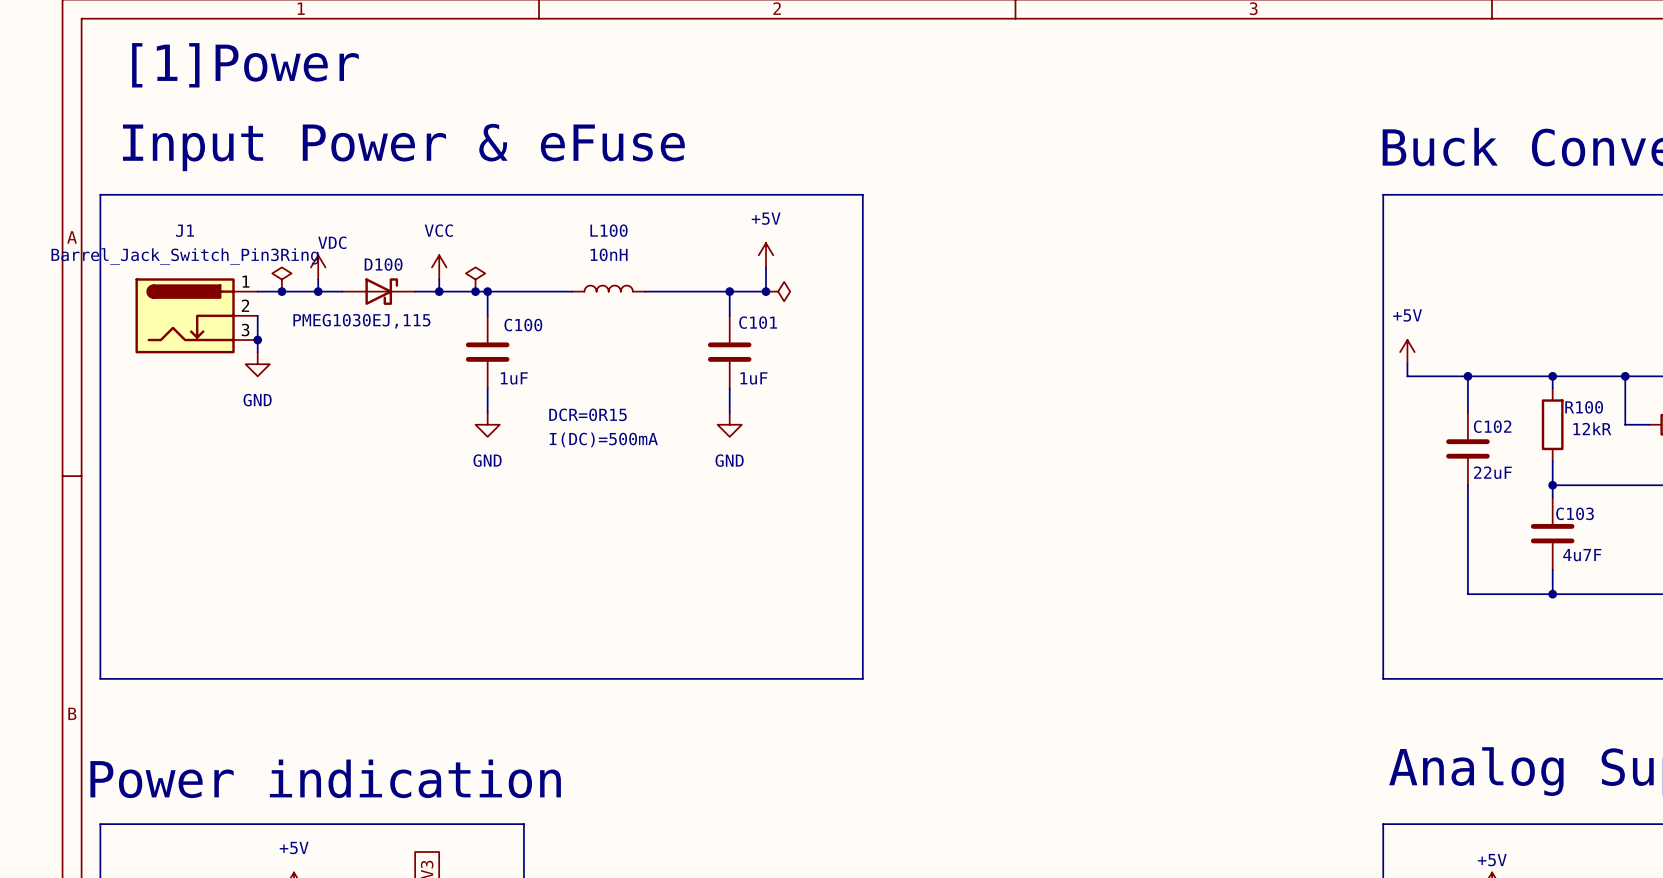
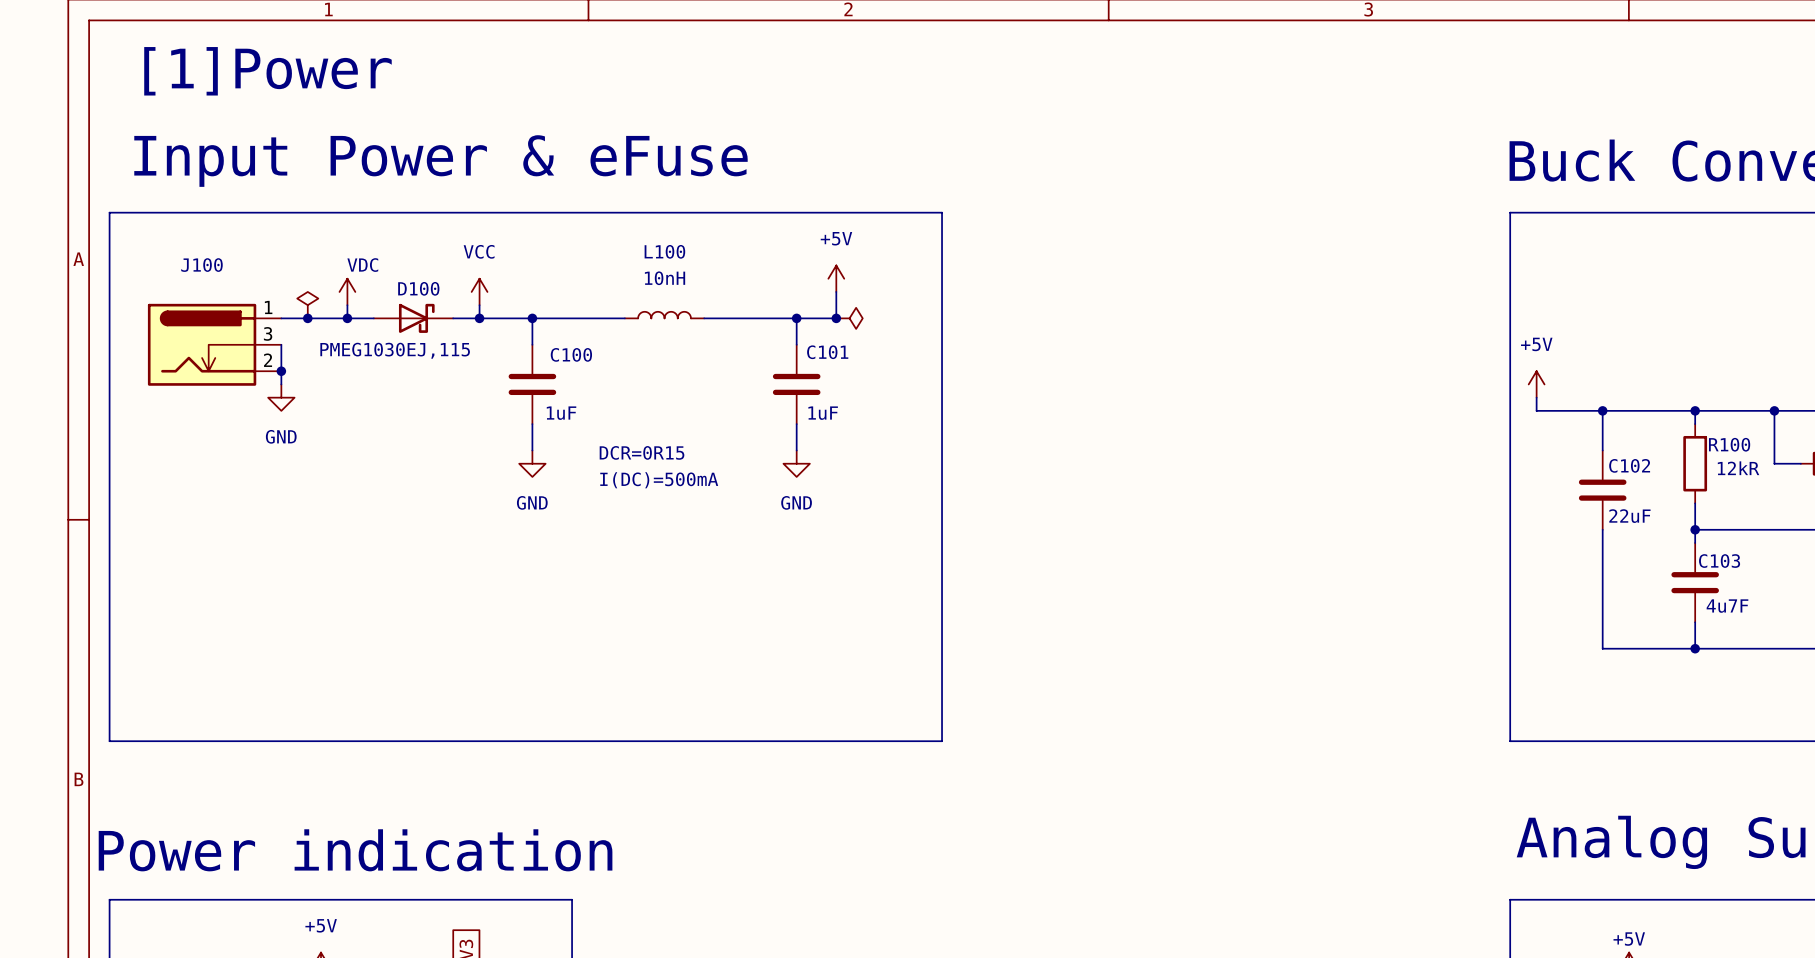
power symbol: (475, 279) -> none
junction: (475, 291) -> none
J1: Barrel_Jack_Switch_Pin3Ring (196, 315) -> none
J100: none -> (214, 344)

